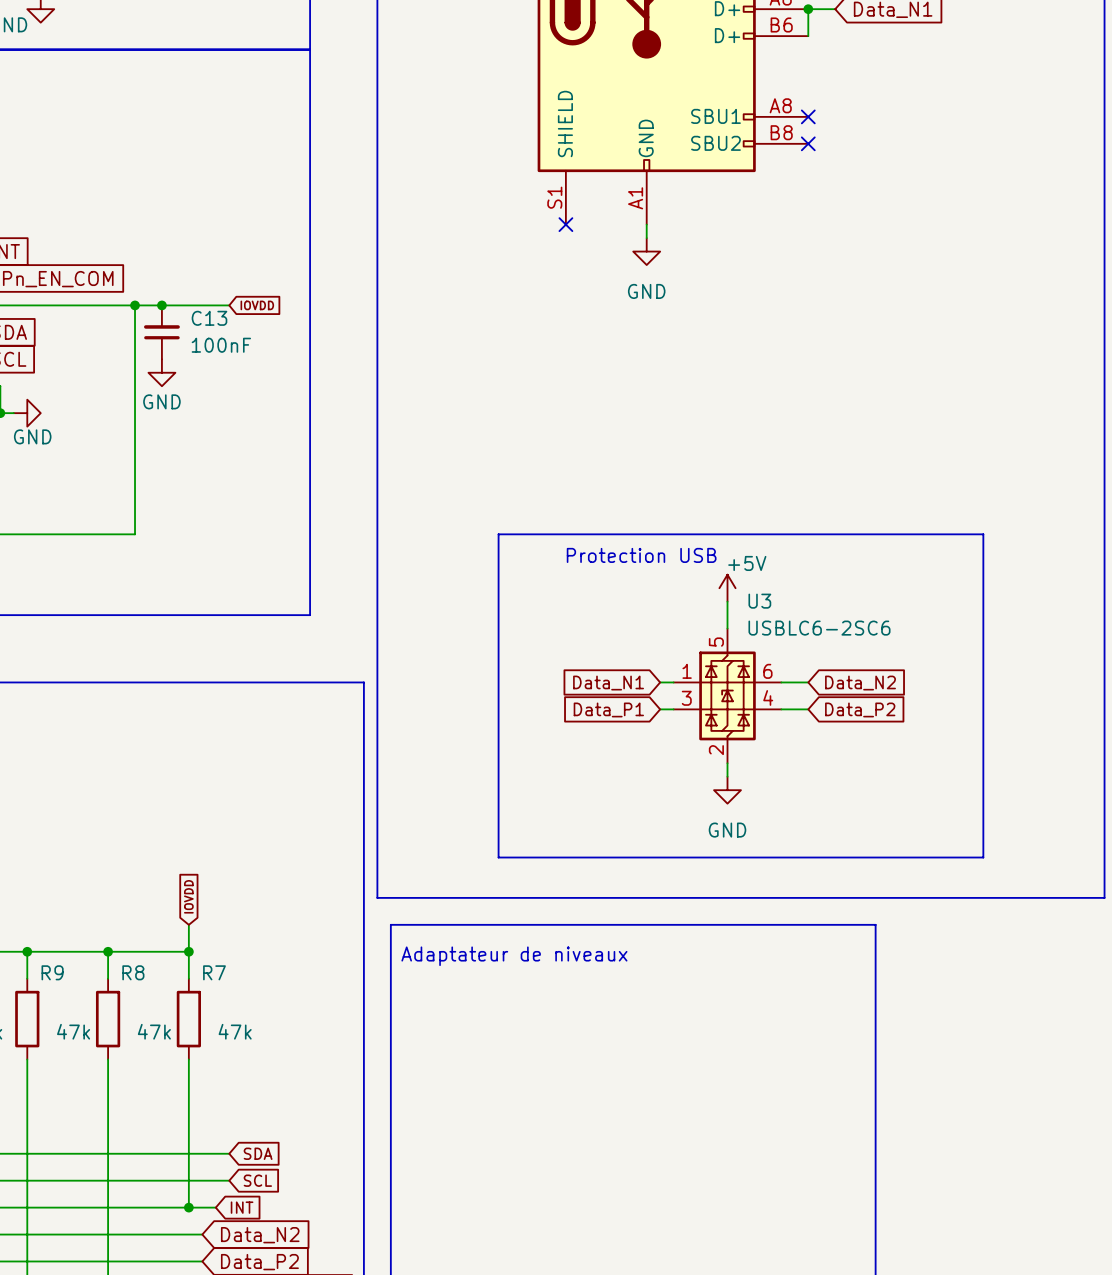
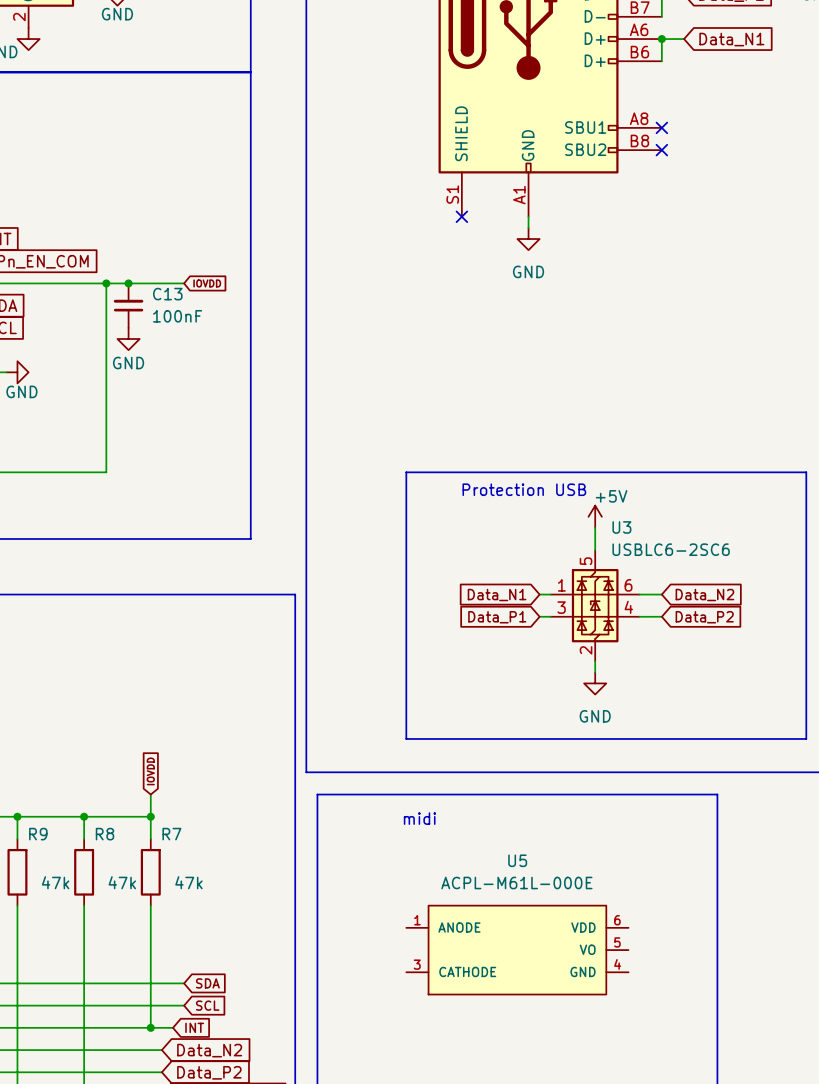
text: Adaptateur de niveaux (514, 956) -> midi (419, 818)
U5: none -> ACPL-M61L-000E (517, 950)

